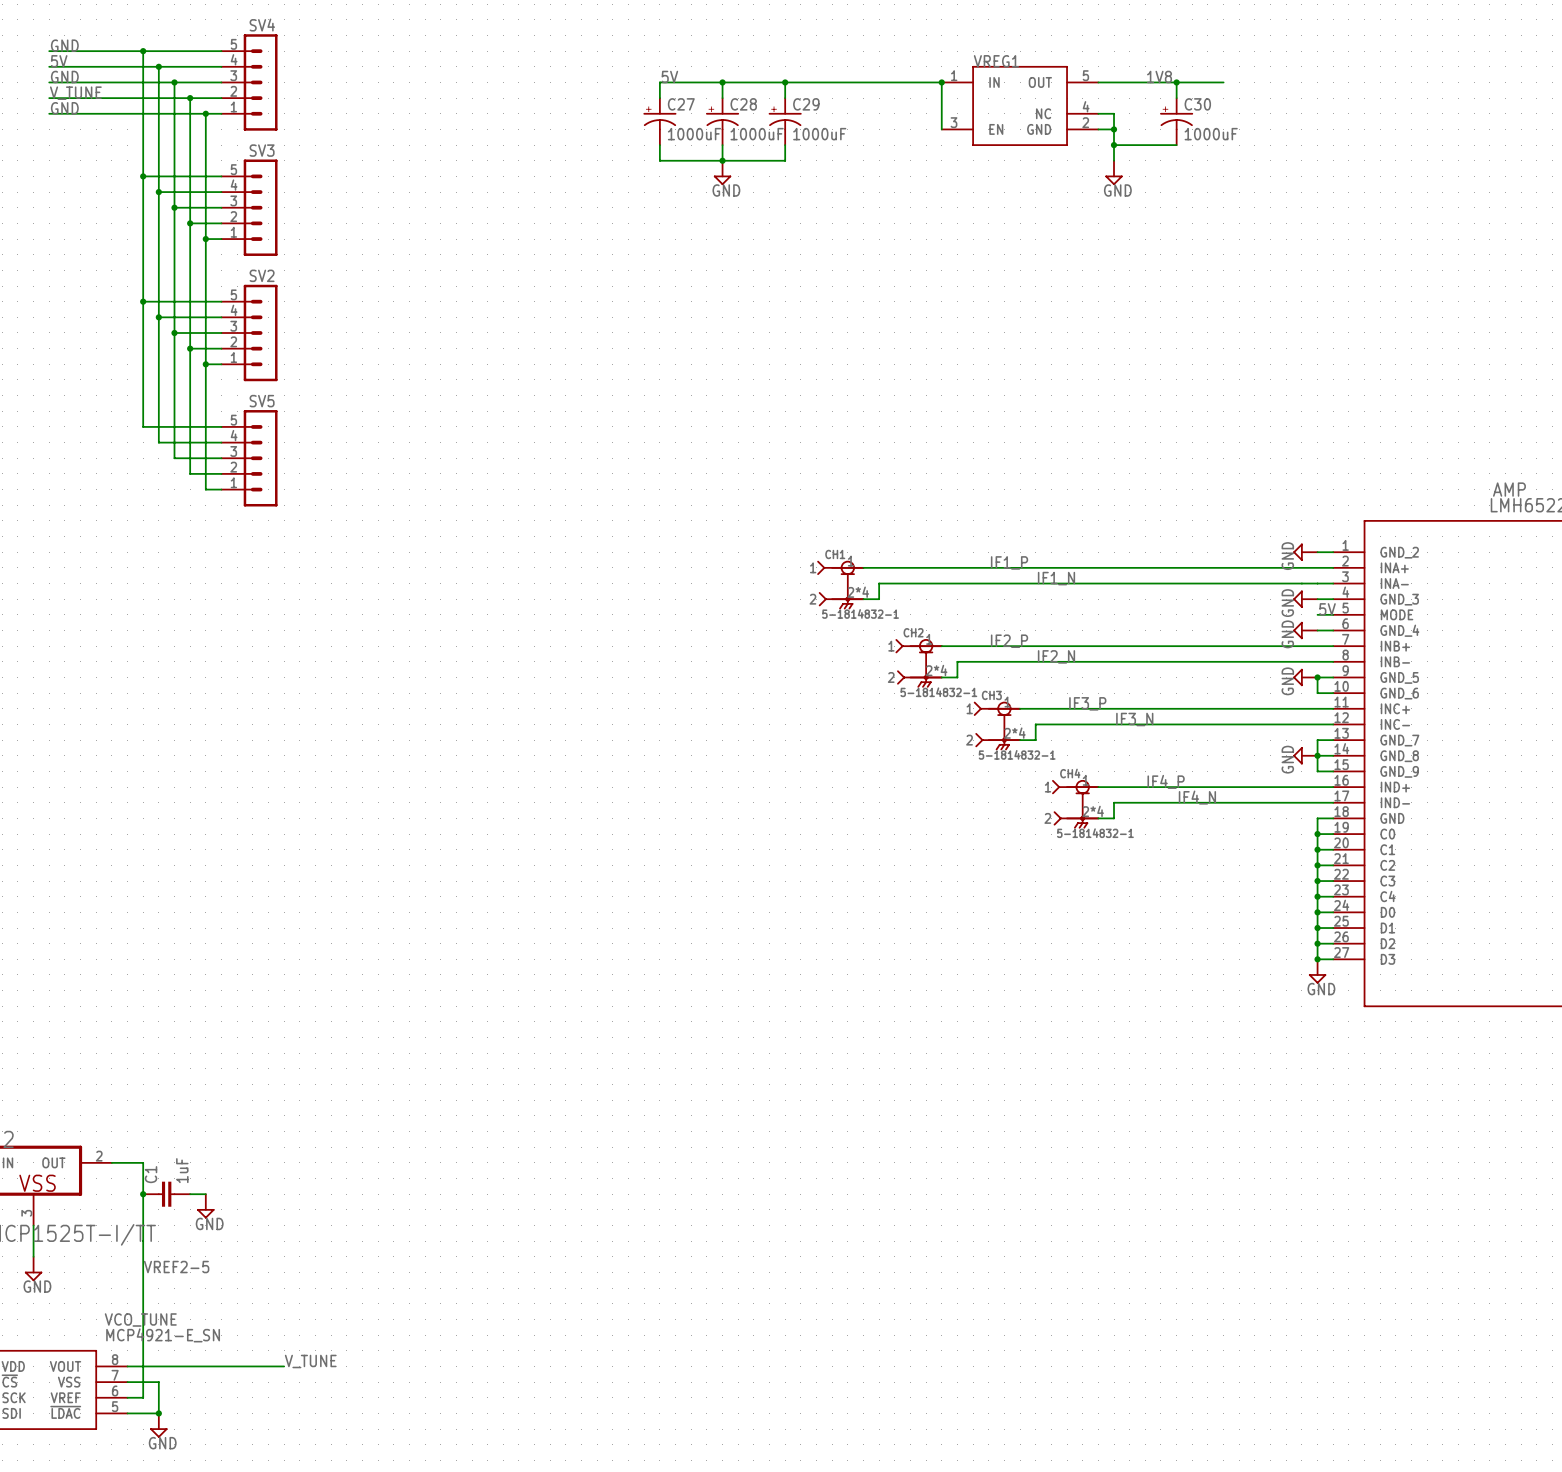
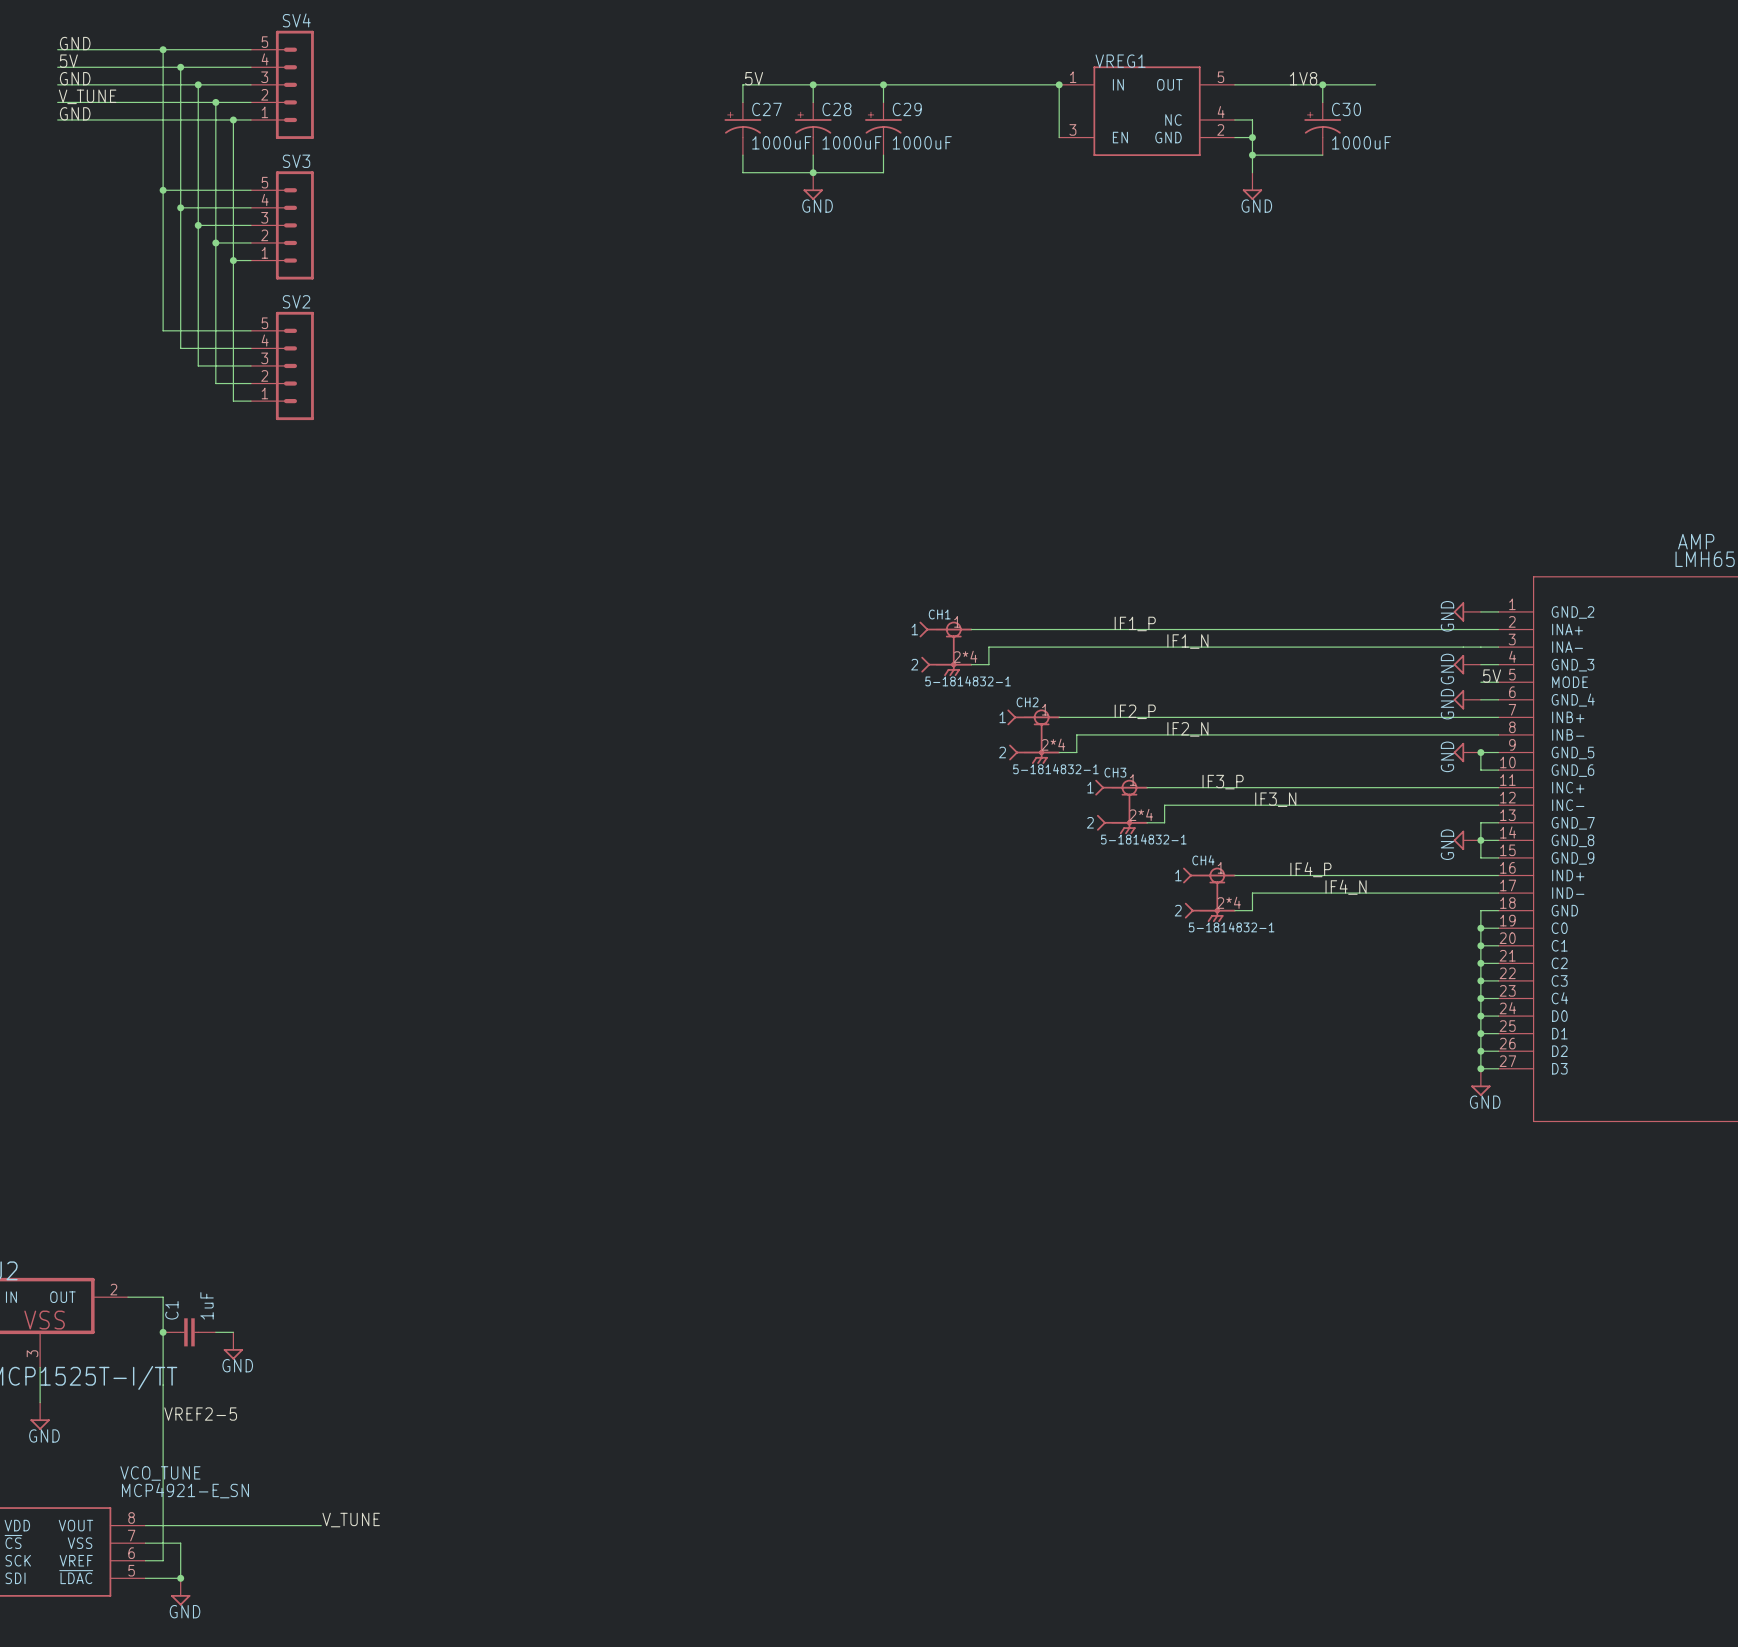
wire: (143, 301) (143, 426) (221, 426) -> none
junction: (143, 301) -> none
wire: (158, 317) (158, 442) (221, 442) -> none
junction: (158, 317) -> none
wire: (174, 332) (174, 458) (221, 458) -> none
junction: (174, 332) -> none
wire: (190, 348) (190, 473) (221, 473) -> none
junction: (190, 348) -> none
wire: (205, 364) (205, 489) (221, 489) -> none
junction: (205, 364) -> none
SV5: (249, 458) -> none

